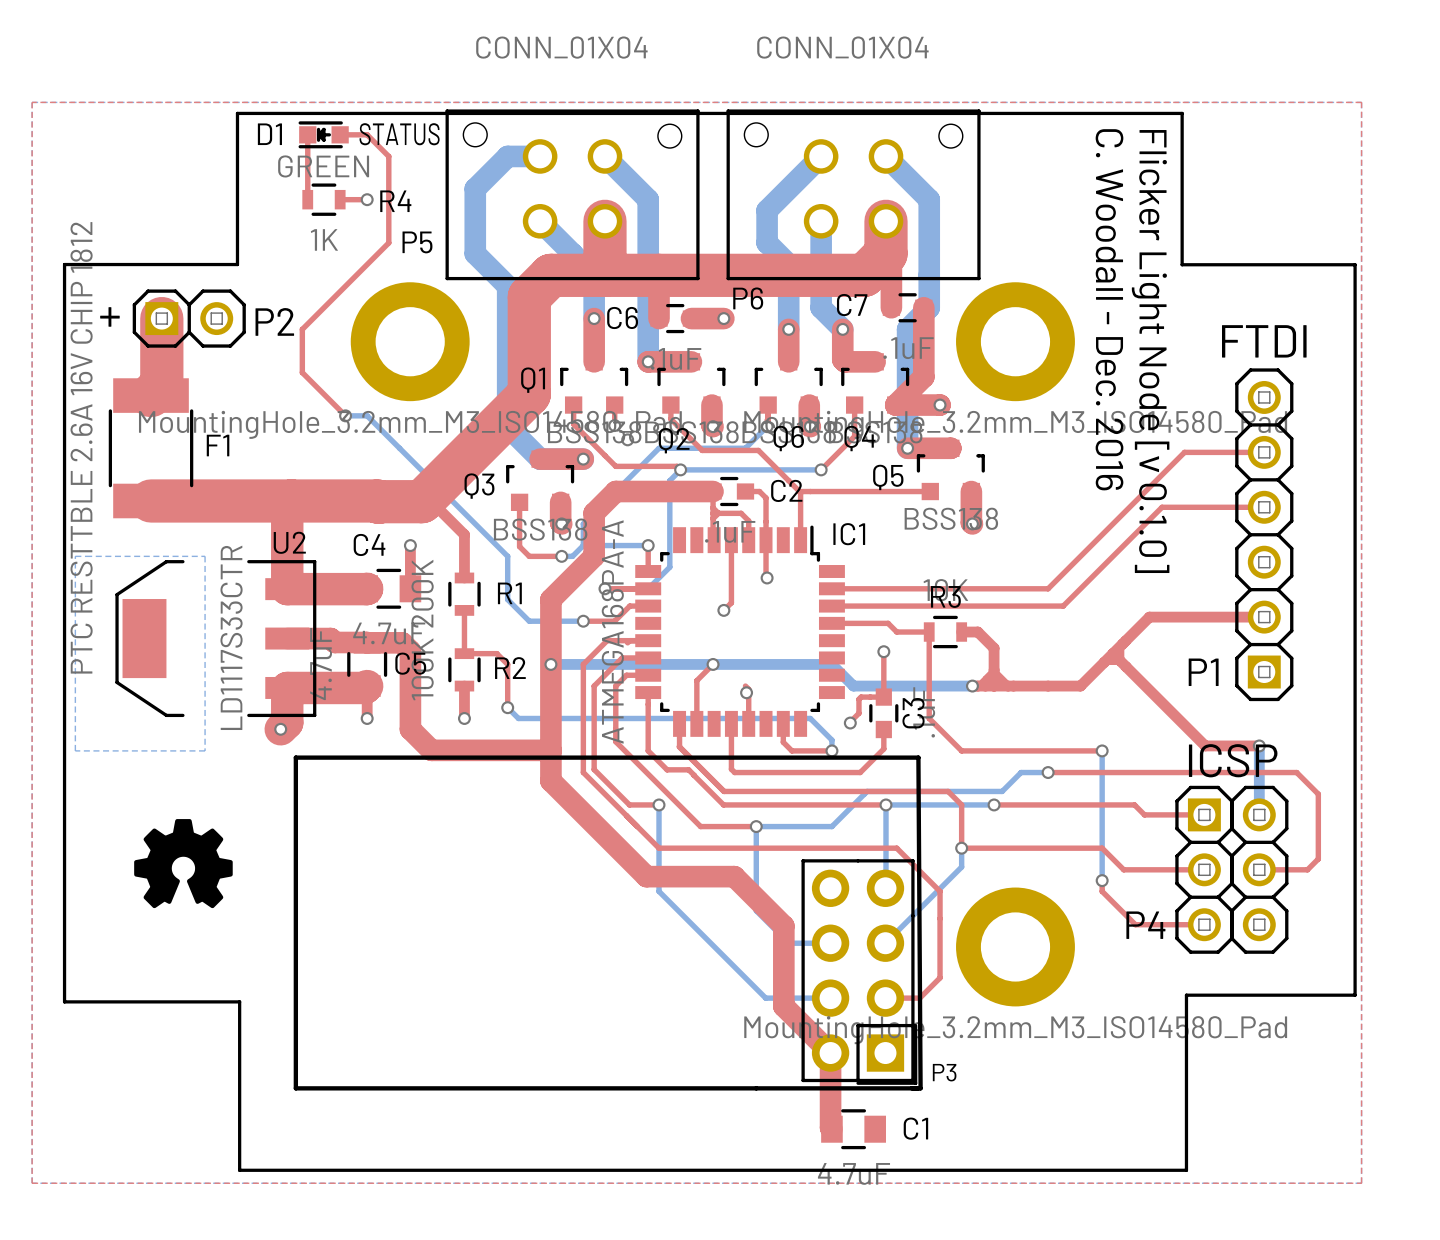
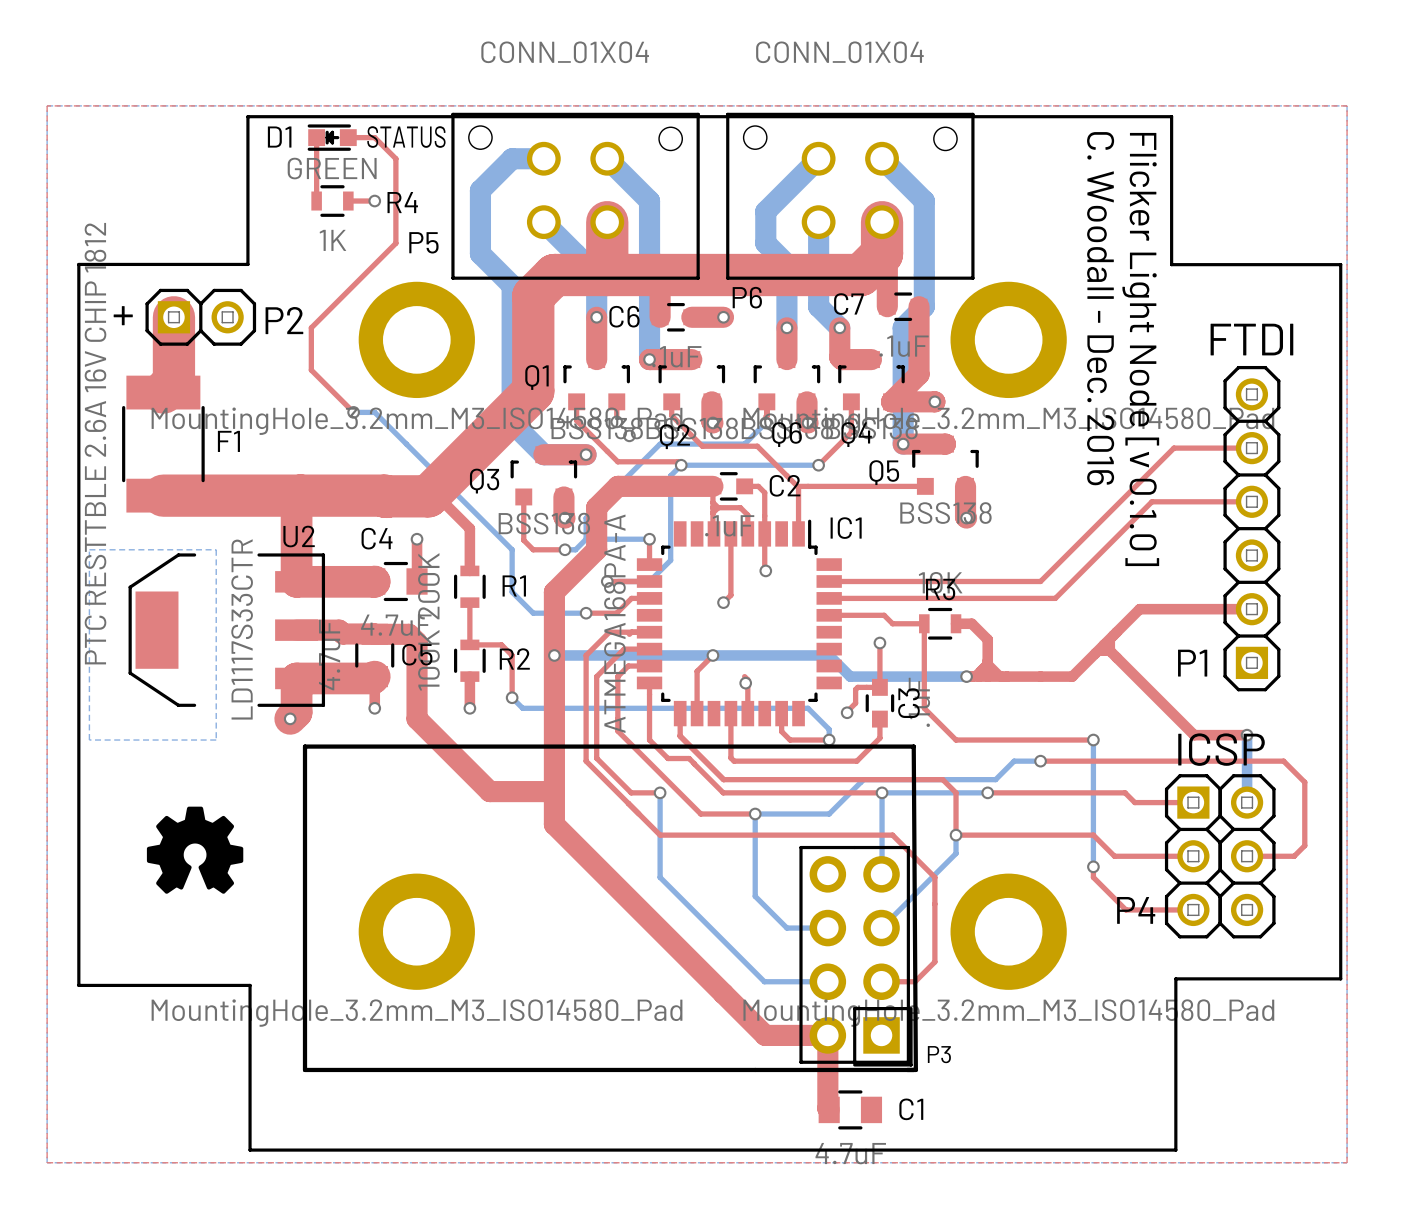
top track: (431, 750) (550, 750) -> (437, 739) (489, 791) (554, 791)
top track: (550, 781) (646, 876) (734, 876) (783, 926) (783, 1006) (830, 1053) -> (554, 769) (554, 824) (765, 1035) (827, 1035)
part: none -> MountingHole_3.2mm_M3_ISO14580_Pad (416, 931)

